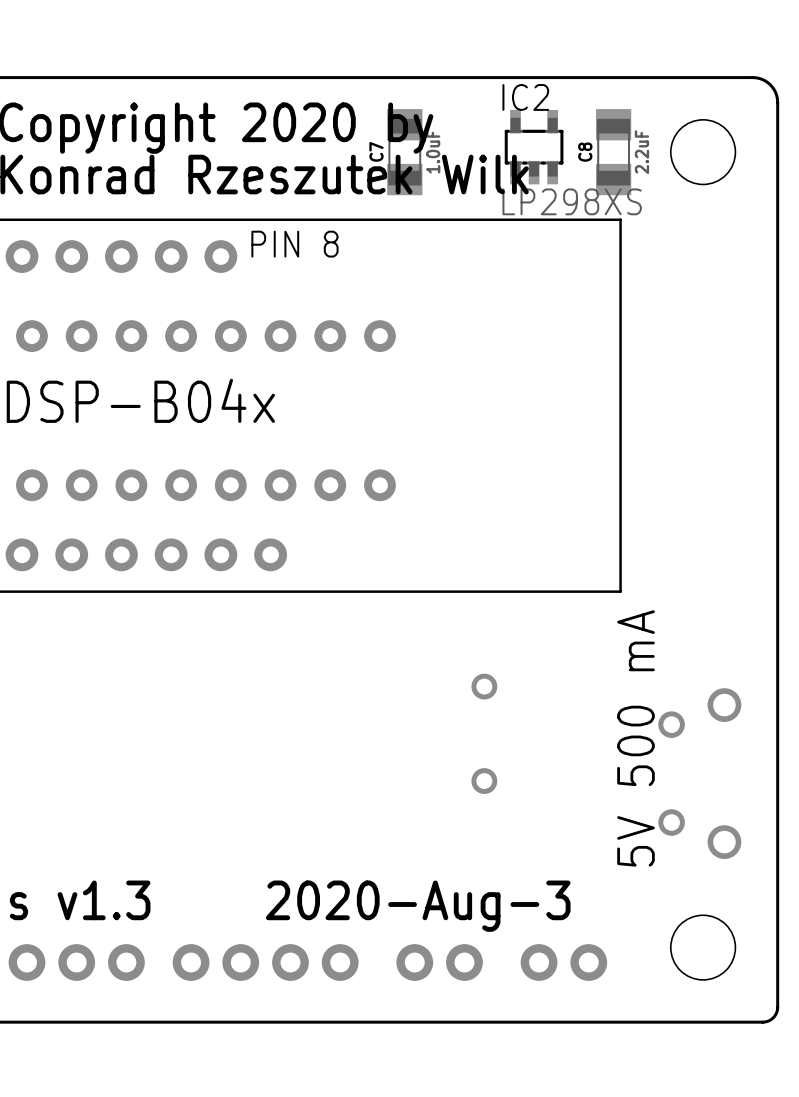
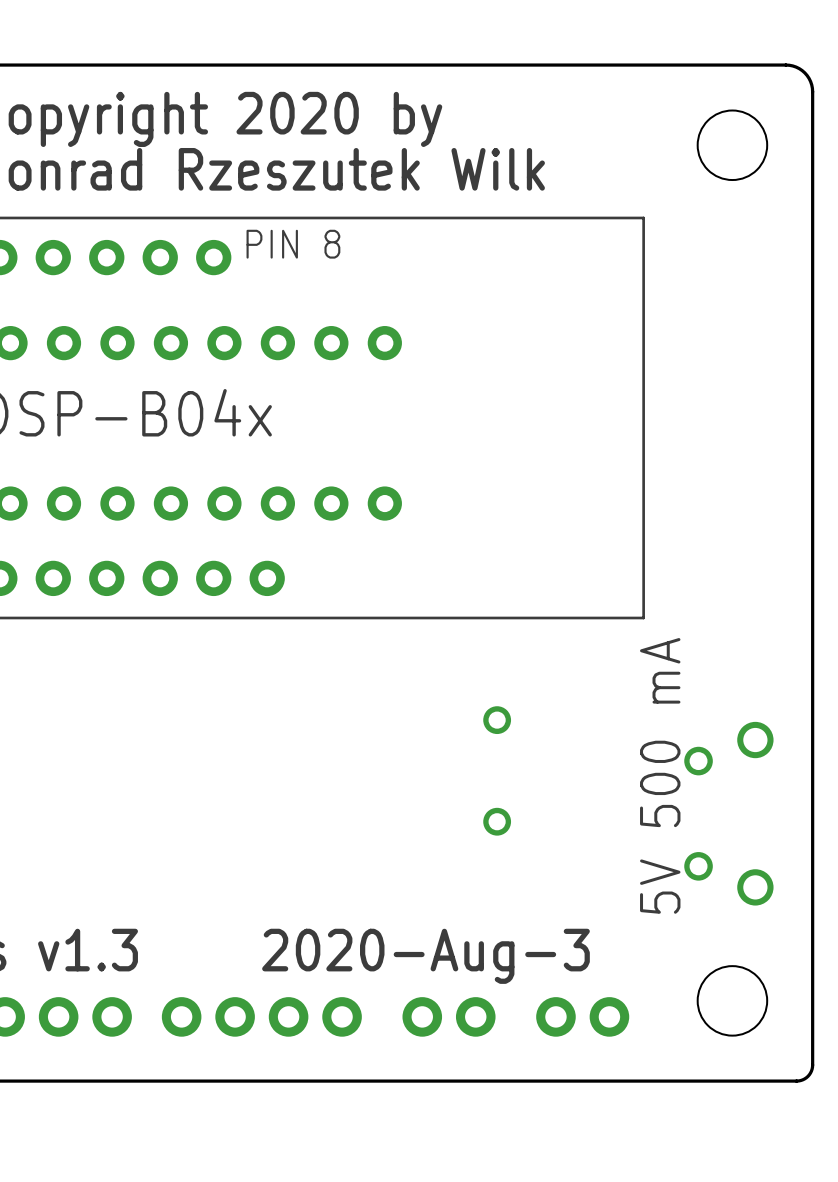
IC2: LP298XS (534, 147) -> none
C7: 1.0uF (404, 152) -> none
C8: 2.2uF (613, 152) -> none

